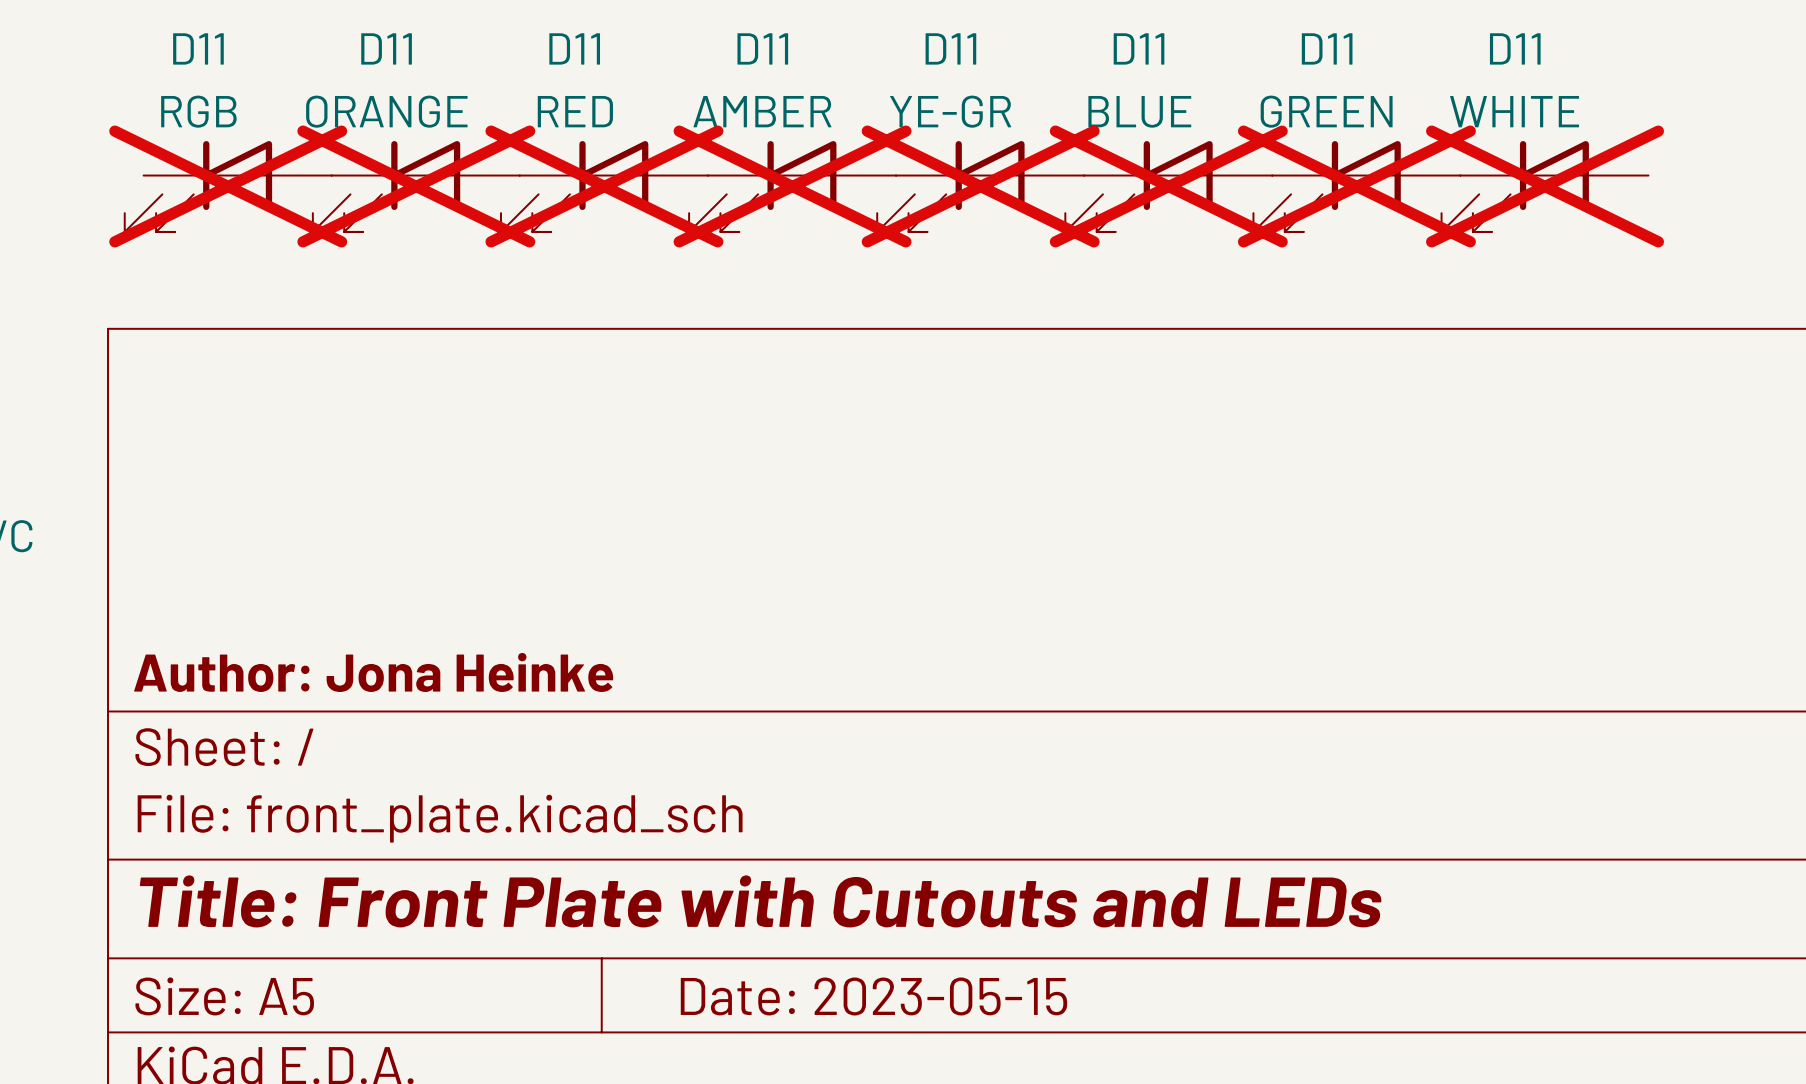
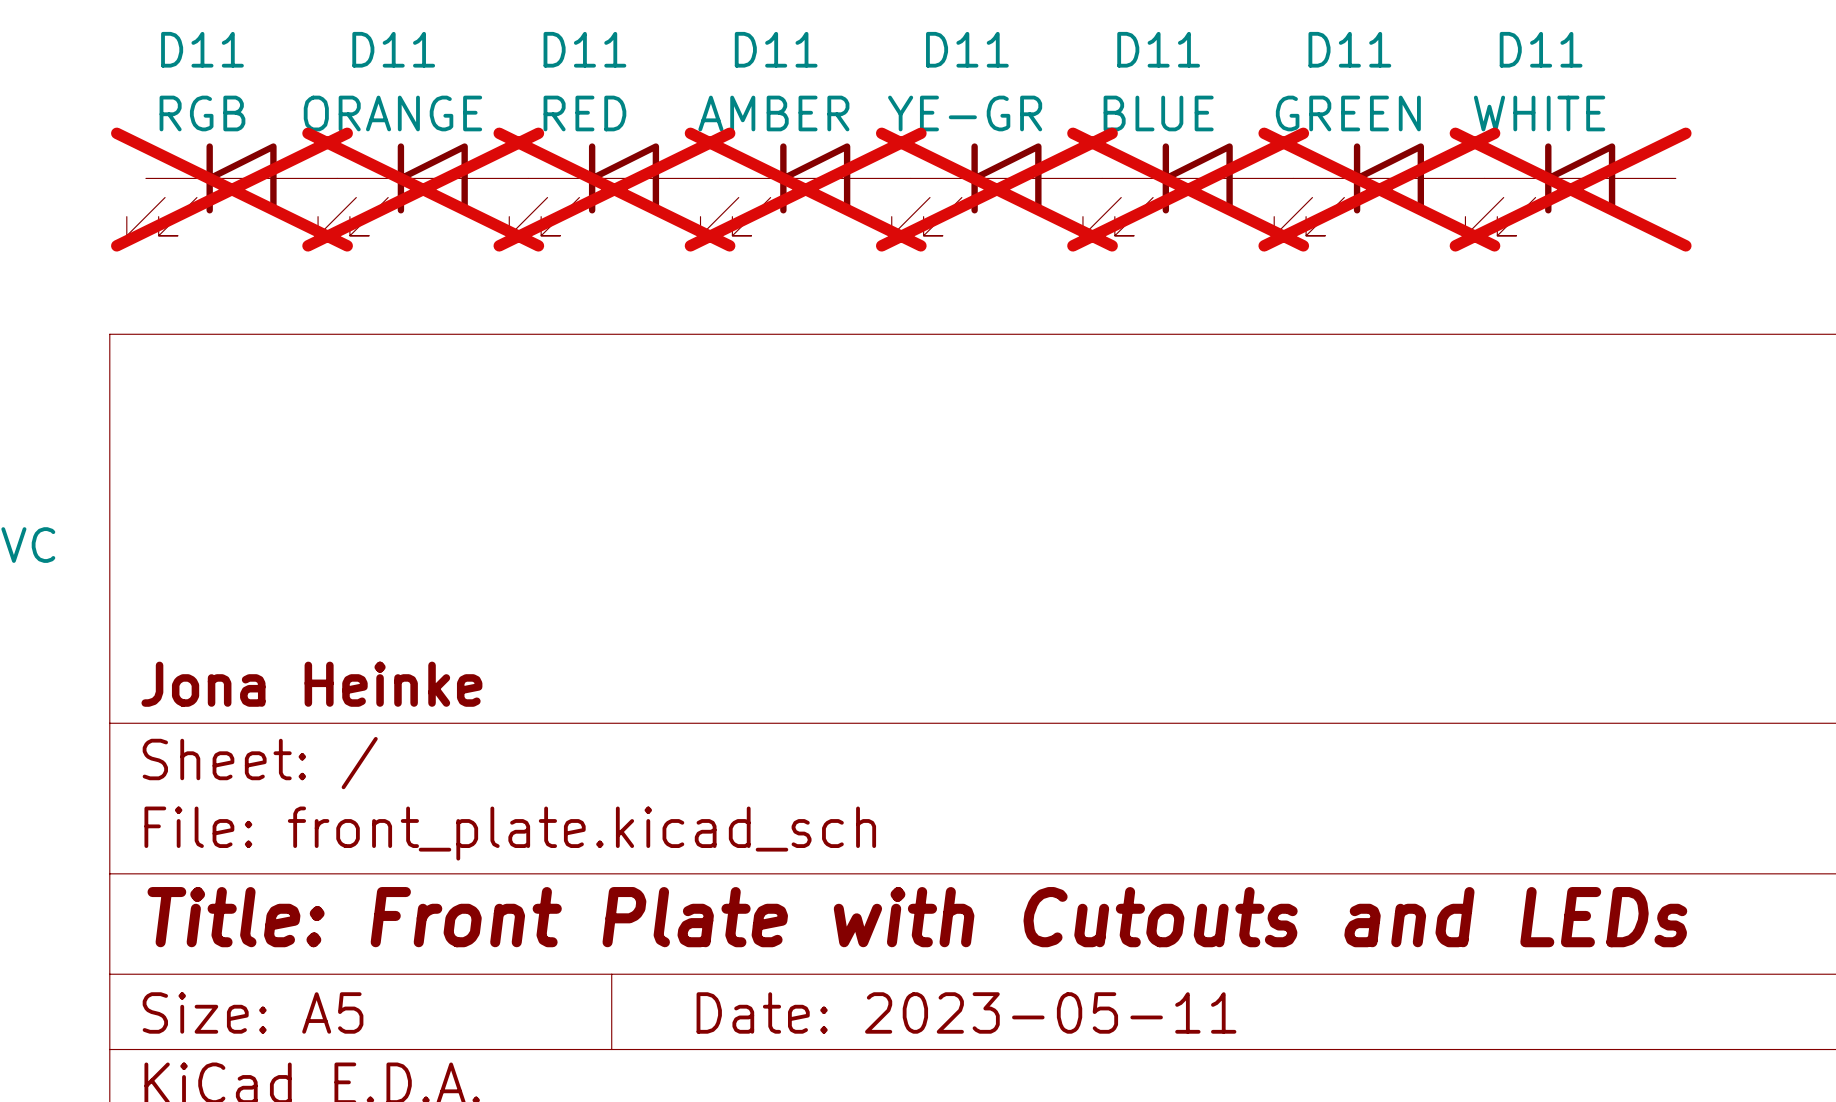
title block: Author: Jona Heinke (373, 672) -> Jona Heinke (311, 684)
title block: Date: 2023-05-15 (873, 996) -> Date: 2023-05-11 (966, 1012)

